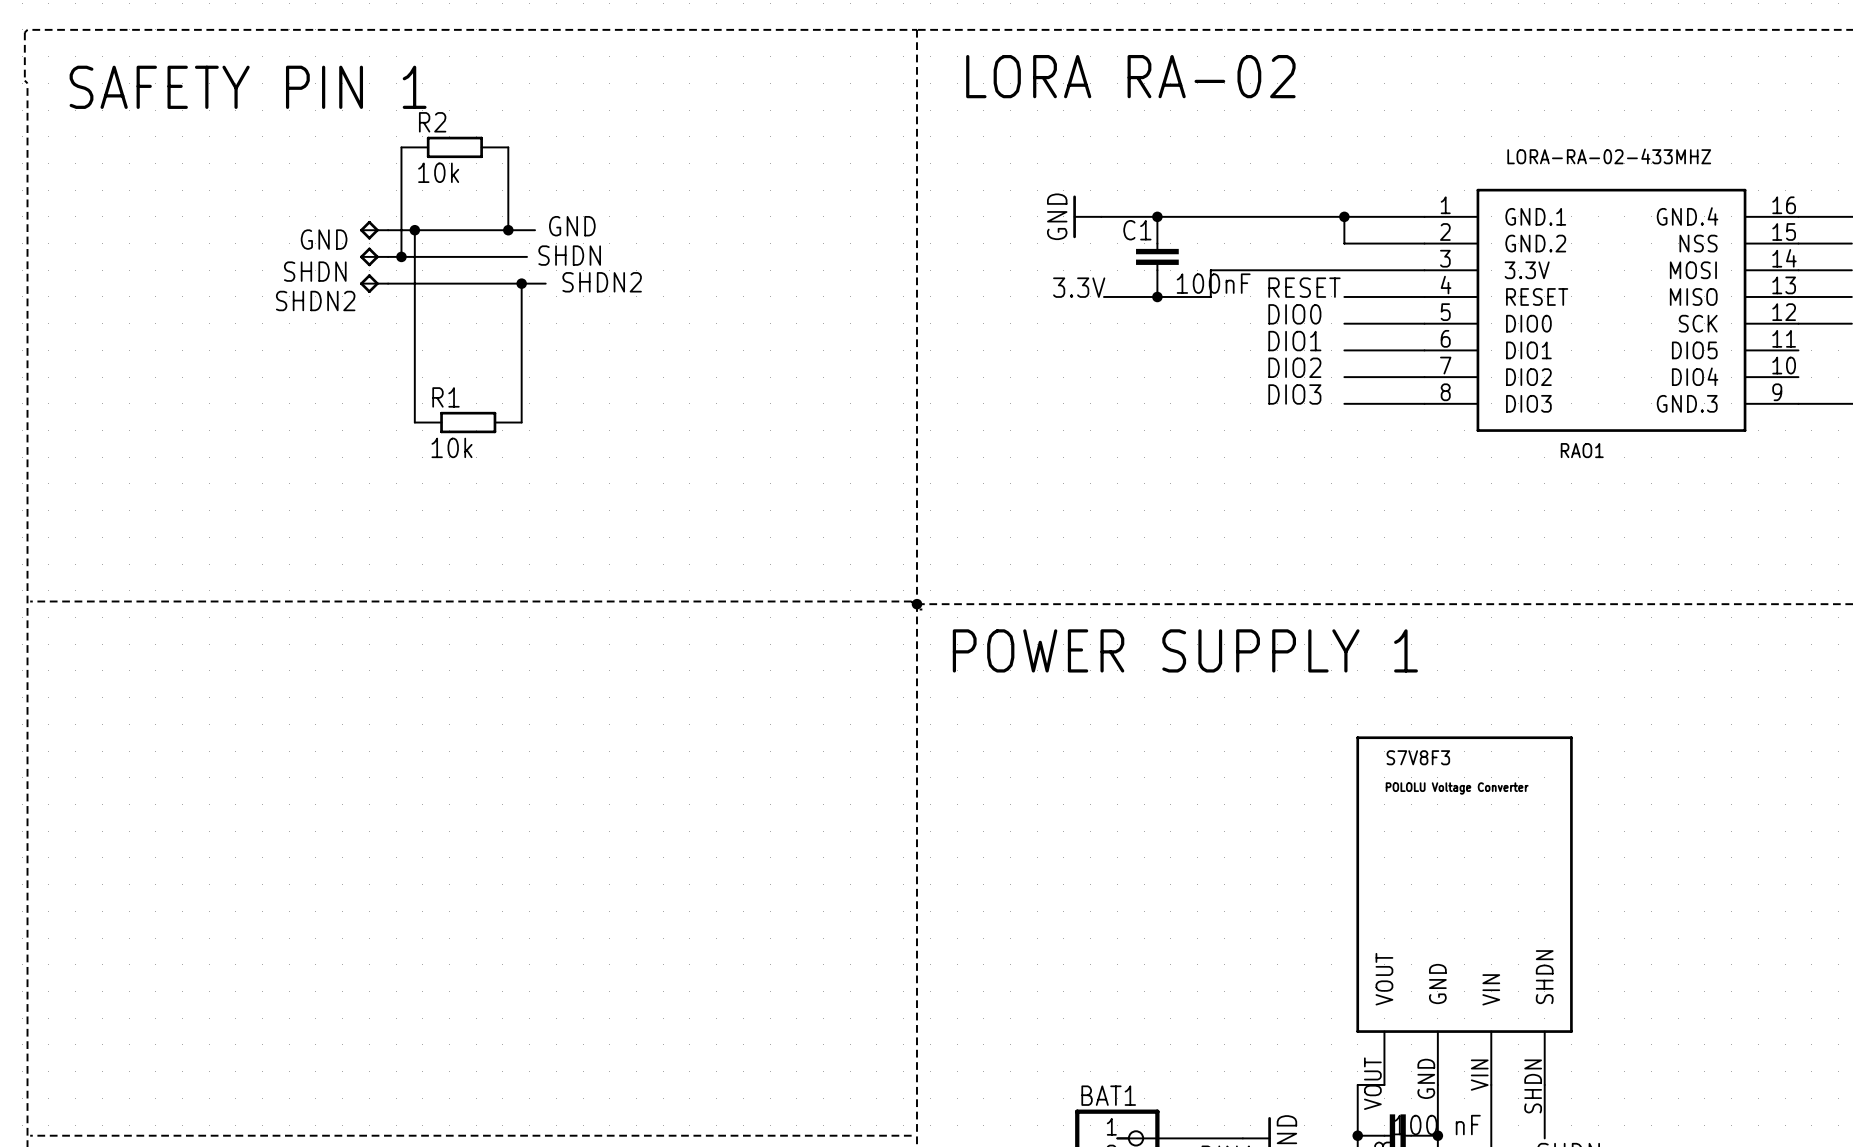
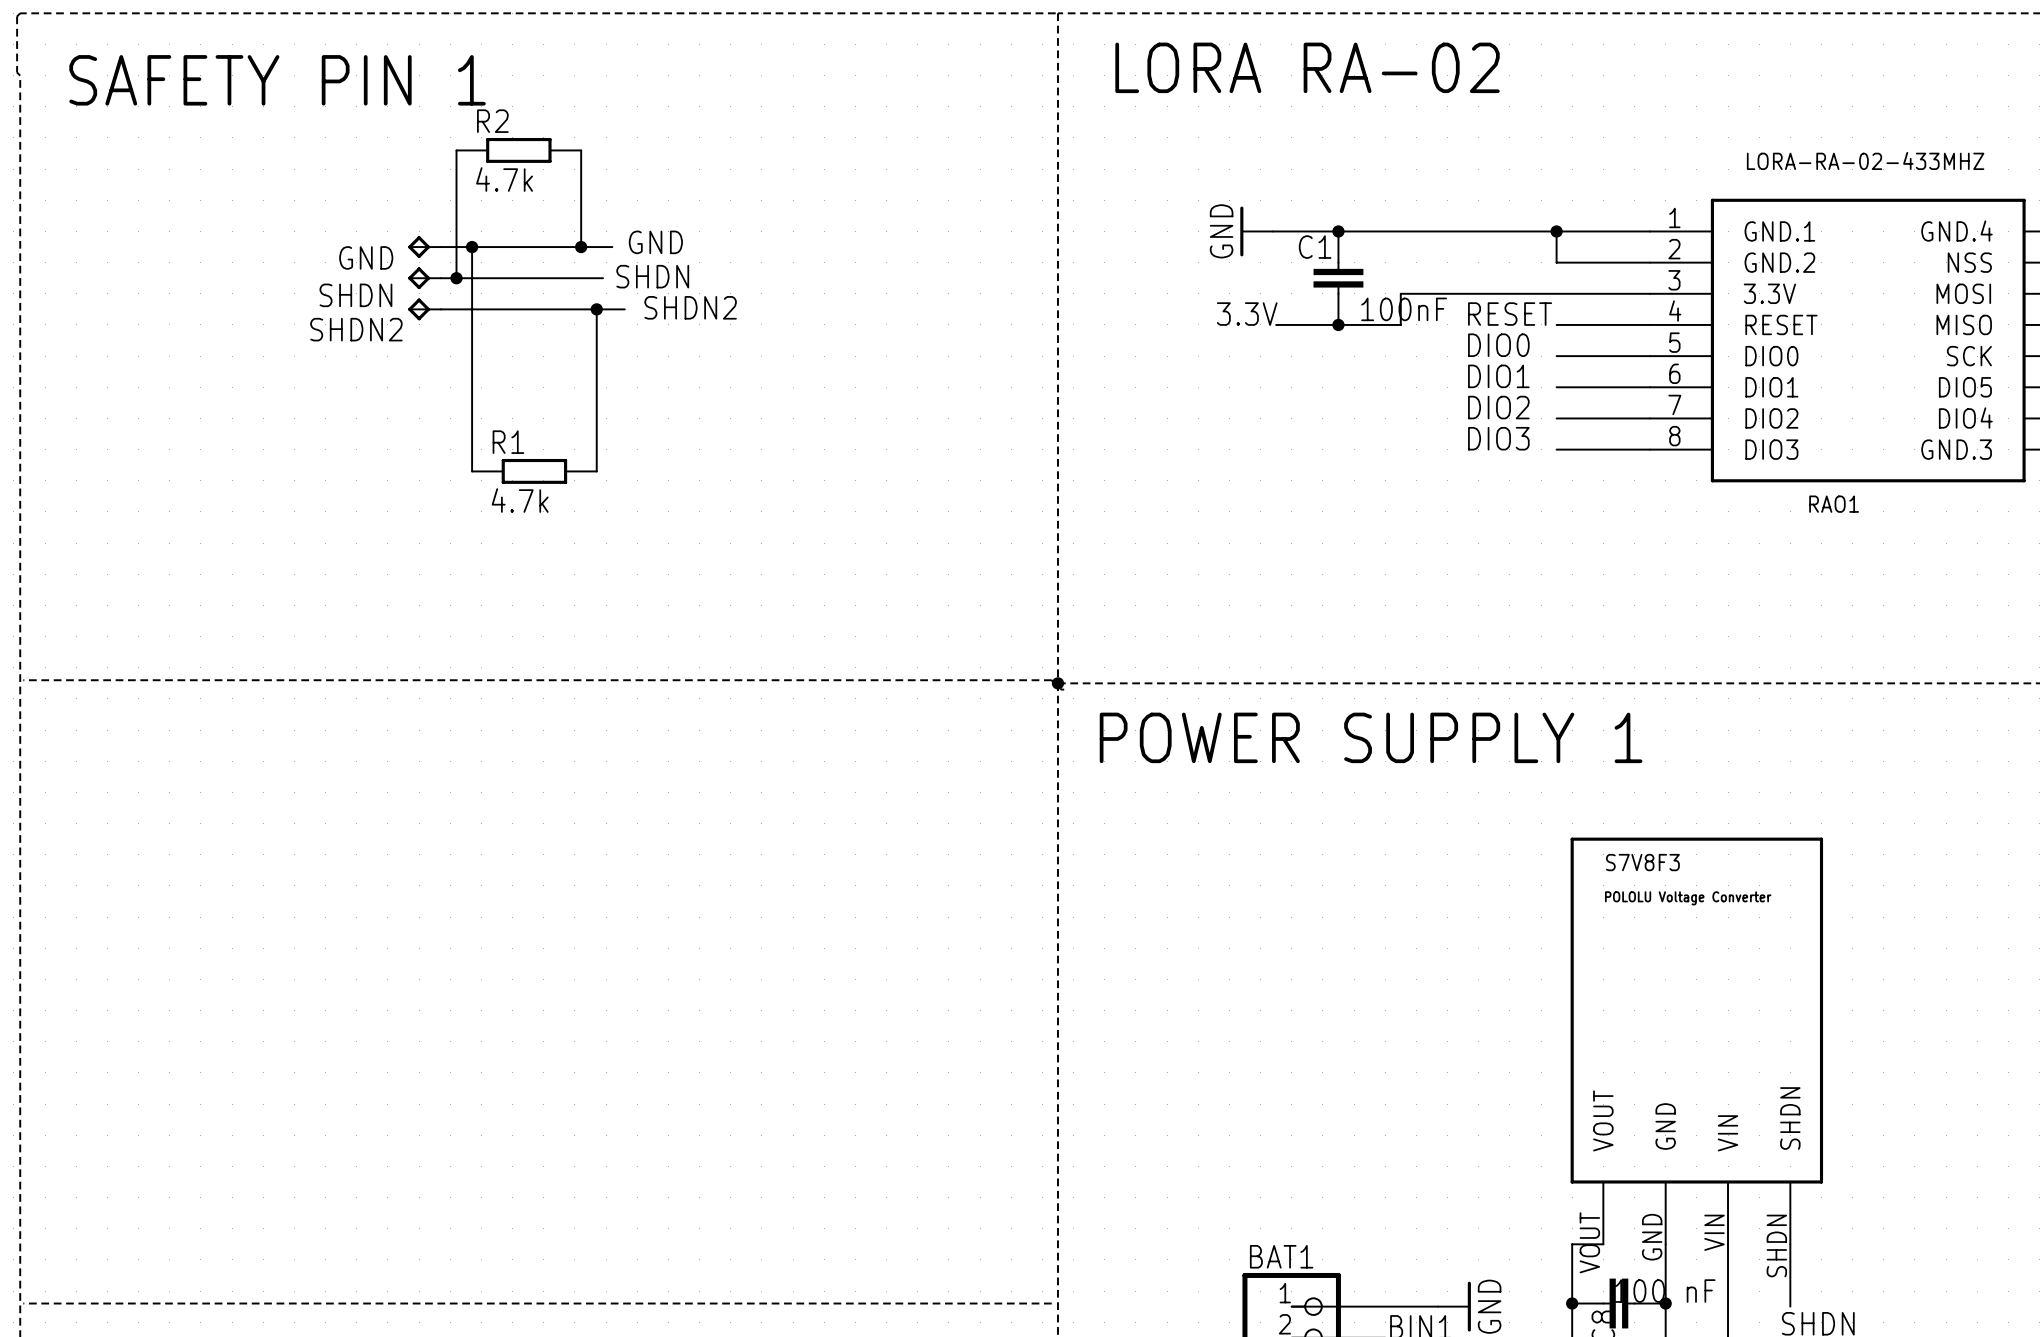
R2 value: 10k (438, 172) -> 4.7k (504, 179)
R1 value: 10k (452, 447) -> 4.7k (520, 500)

